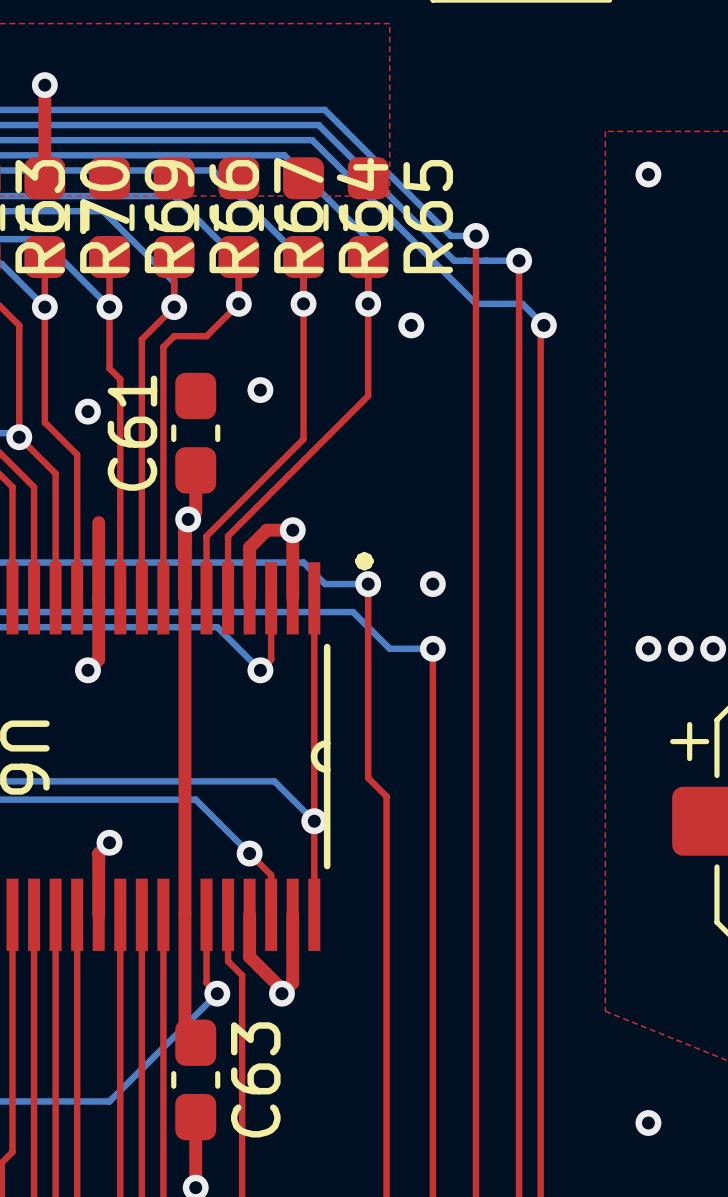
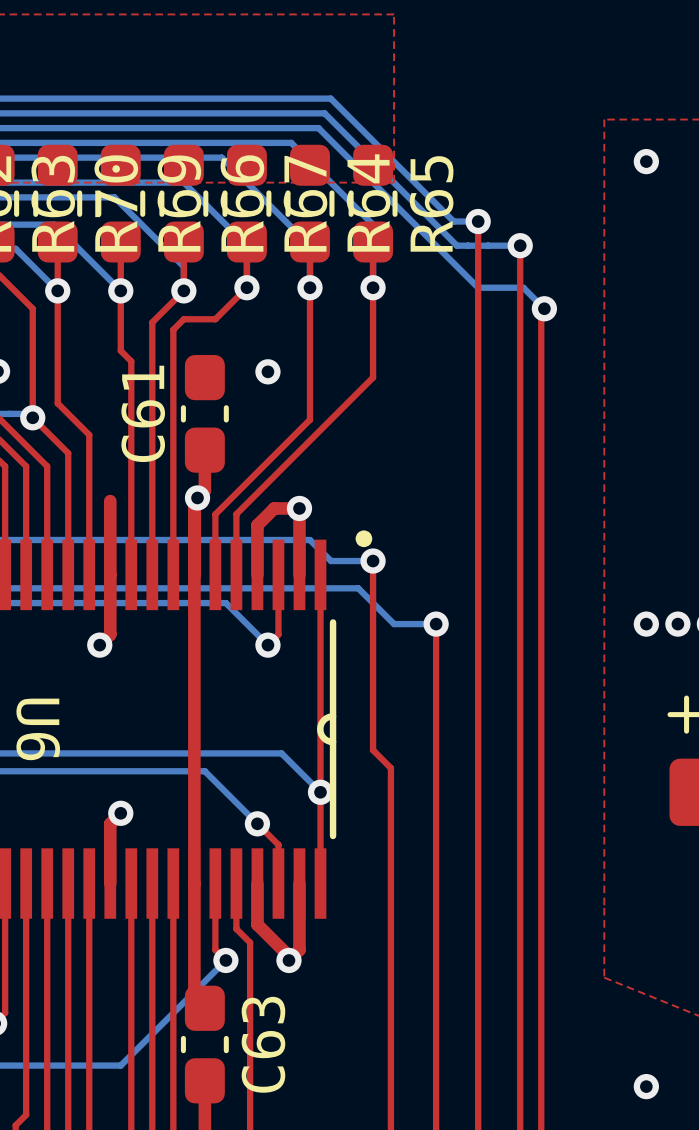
top track: (44, 85) (44, 178) -> none
via: (44, 85) -> none
via: (411, 325) -> none
via: (87, 411) -> none
via: (432, 584) -> none

